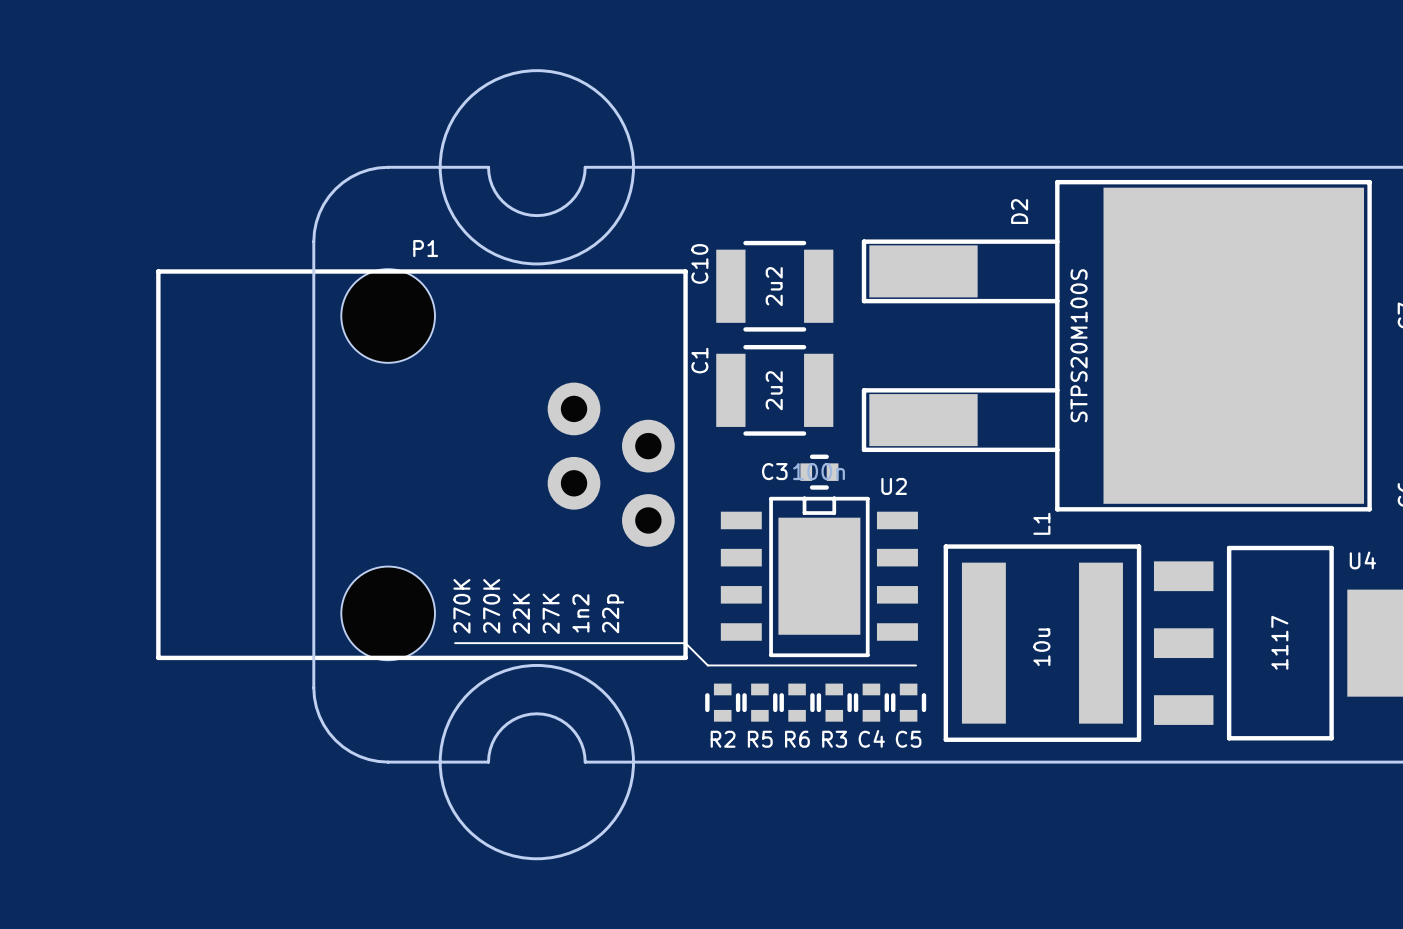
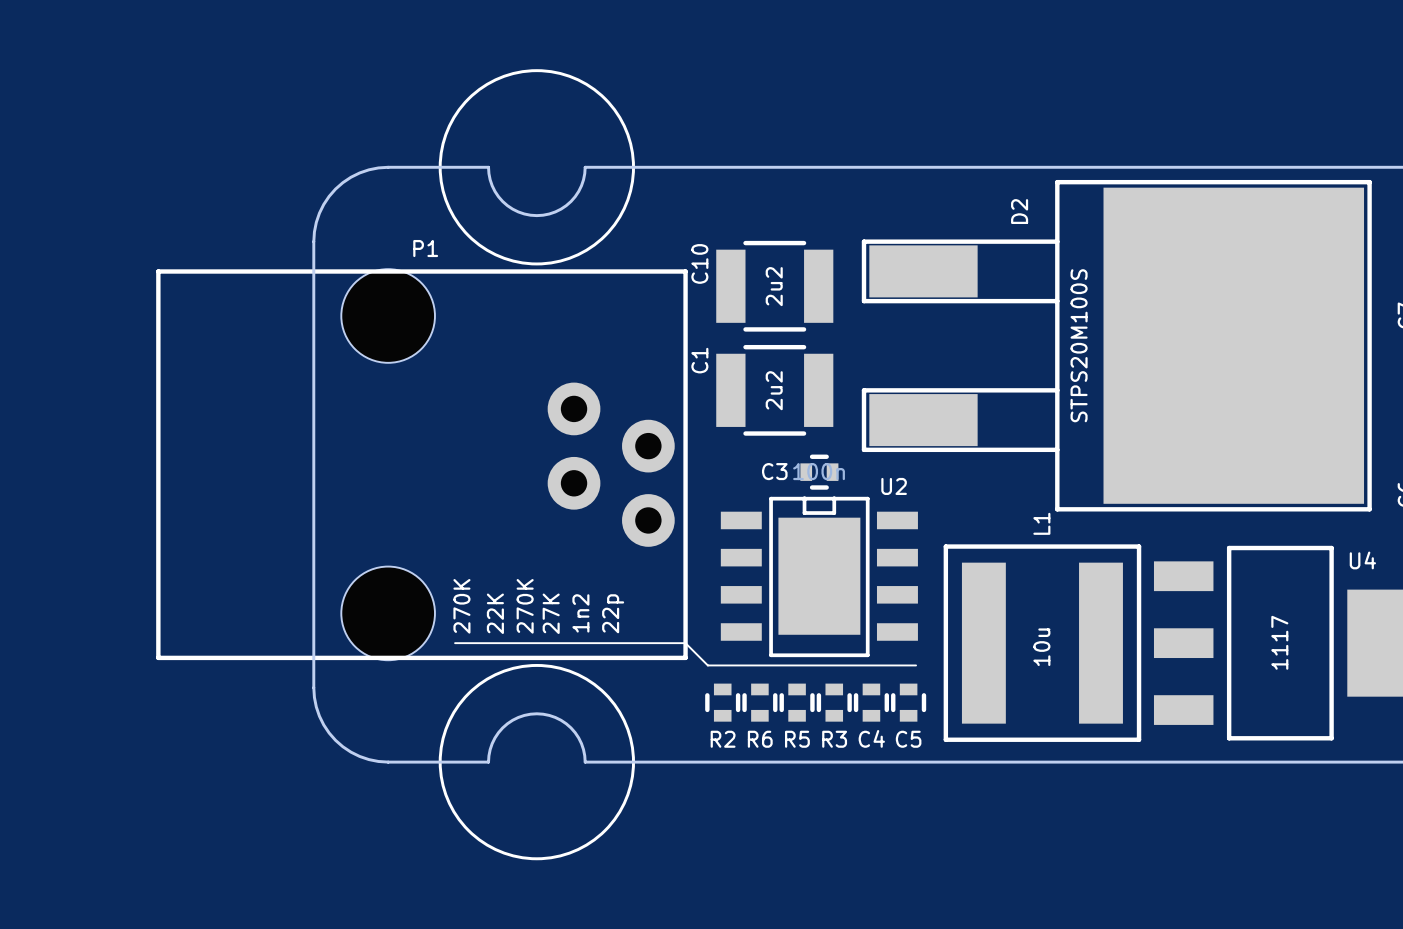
round board edge: [438, 69, 635, 266] -> none
drawing: none -> [438, 69, 635, 266]
R5 value: 270K (491, 606) -> 22K (495, 613)
R6 value: 22K (521, 613) -> 270K (525, 606)
round board edge: [438, 663, 635, 861] -> none
drawing: none -> [438, 663, 635, 861]
R5 name: R5 (760, 739) -> R6 (760, 739)
R6 name: R6 (797, 739) -> R5 (797, 739)

